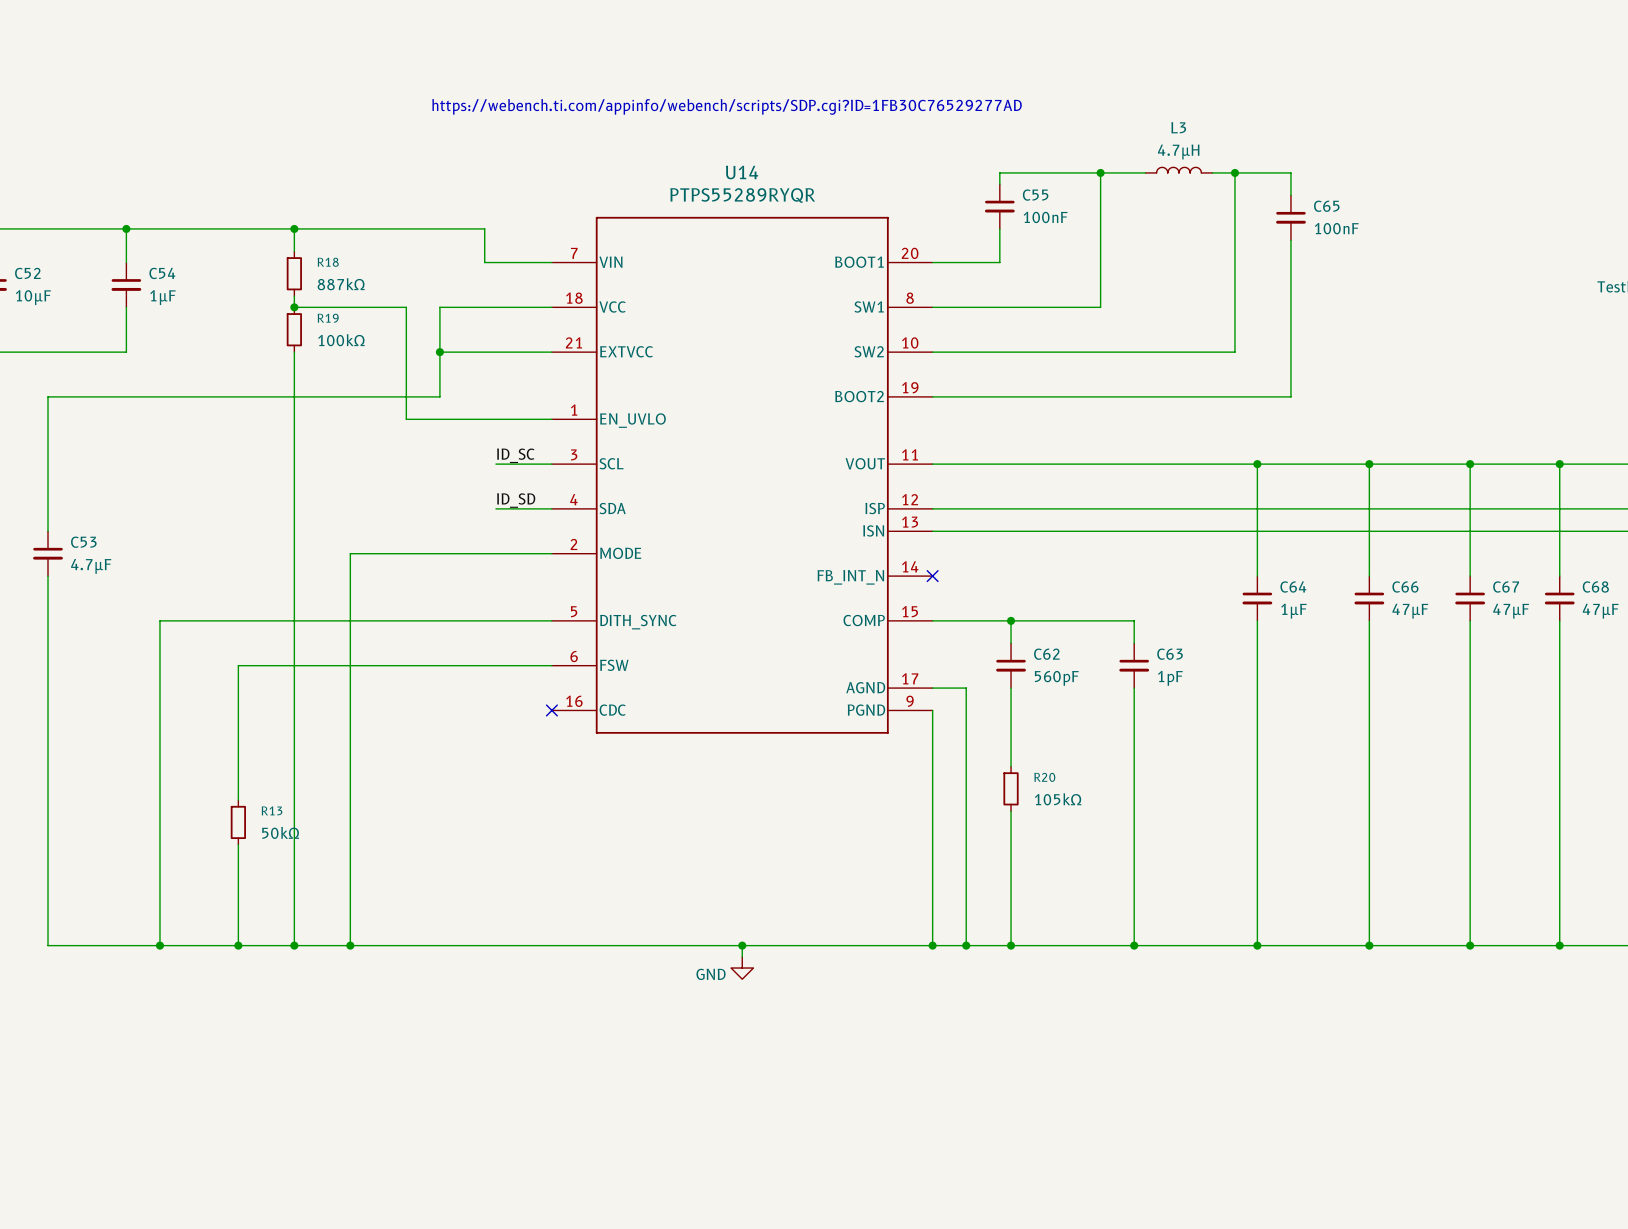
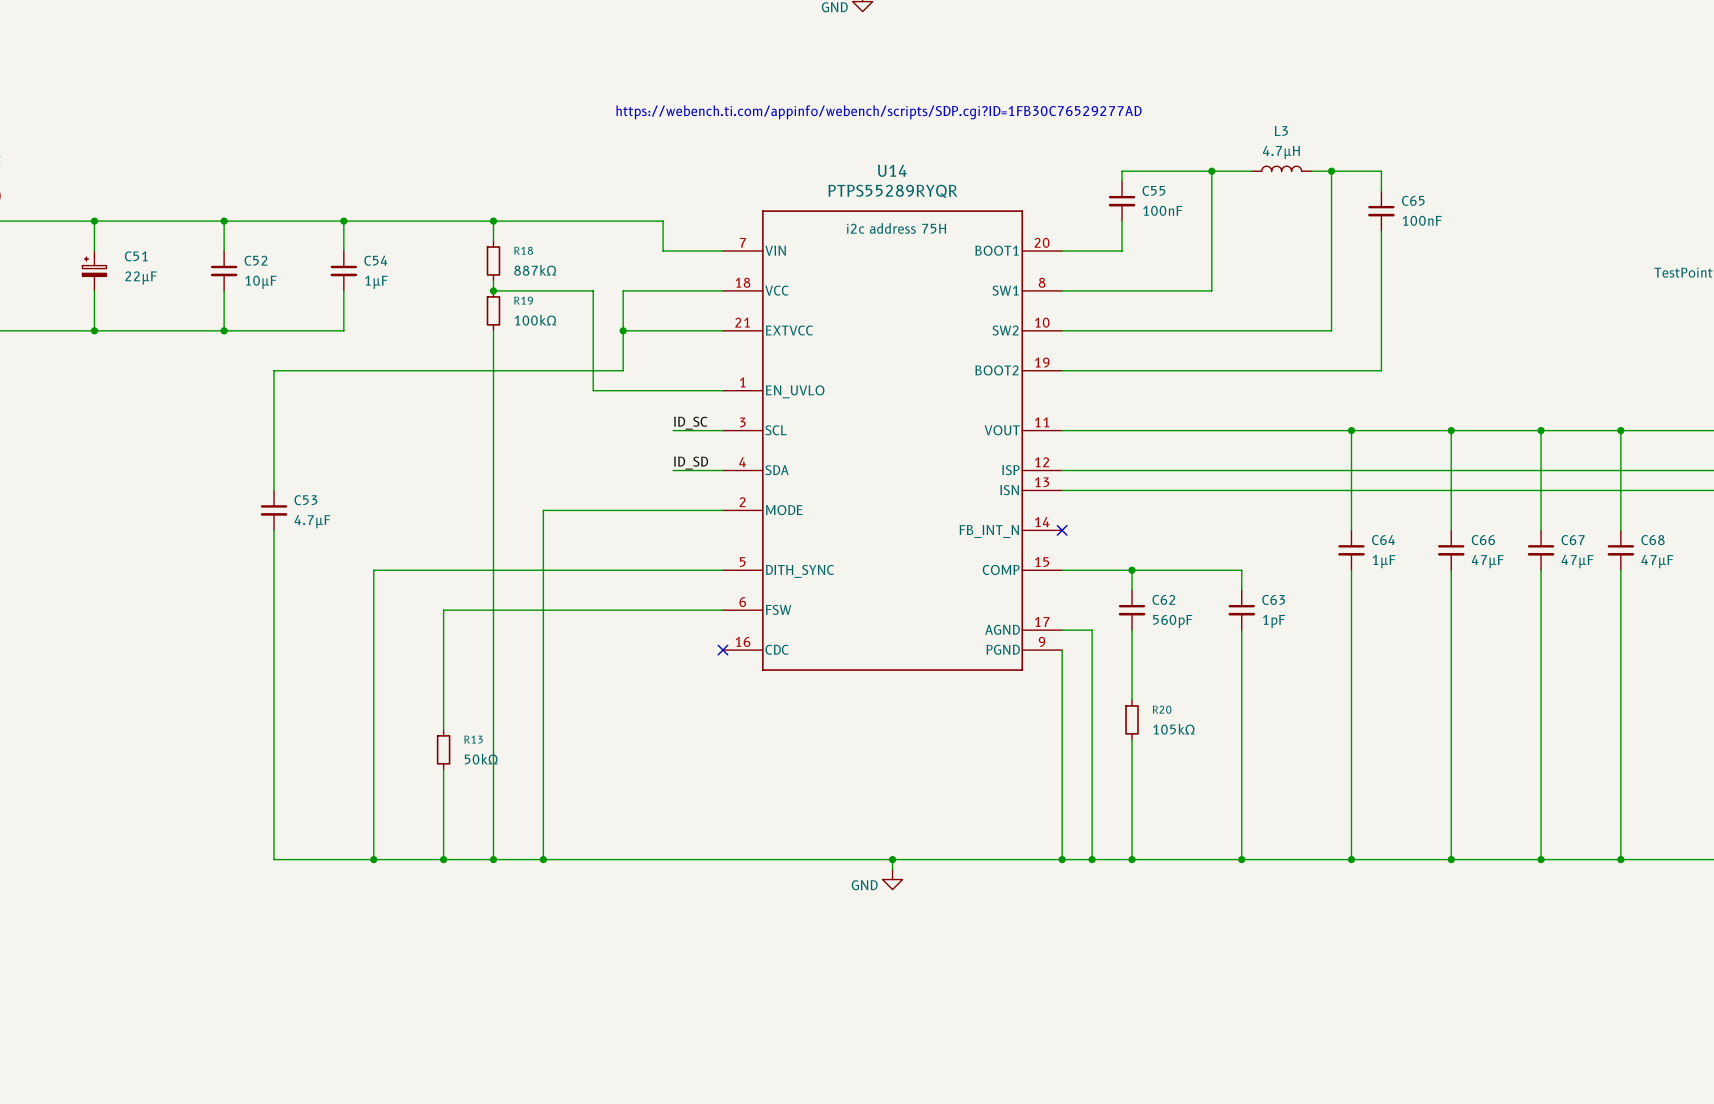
U14 text: none -> i2c address 75H (896, 228)

